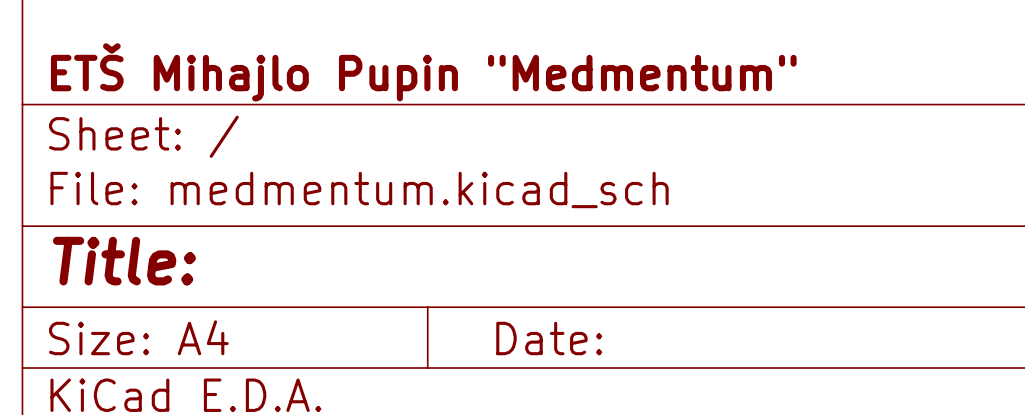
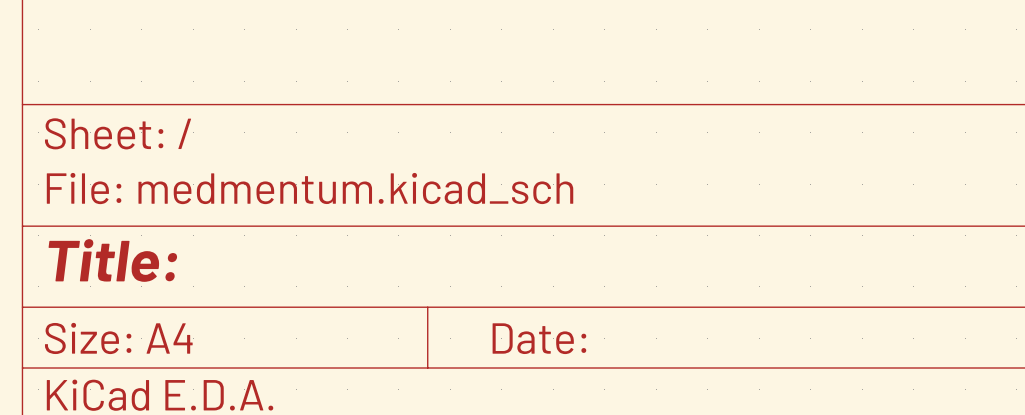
title block: ETŠ Mihajlo Pupin "Medmentum" (423, 72) -> none

